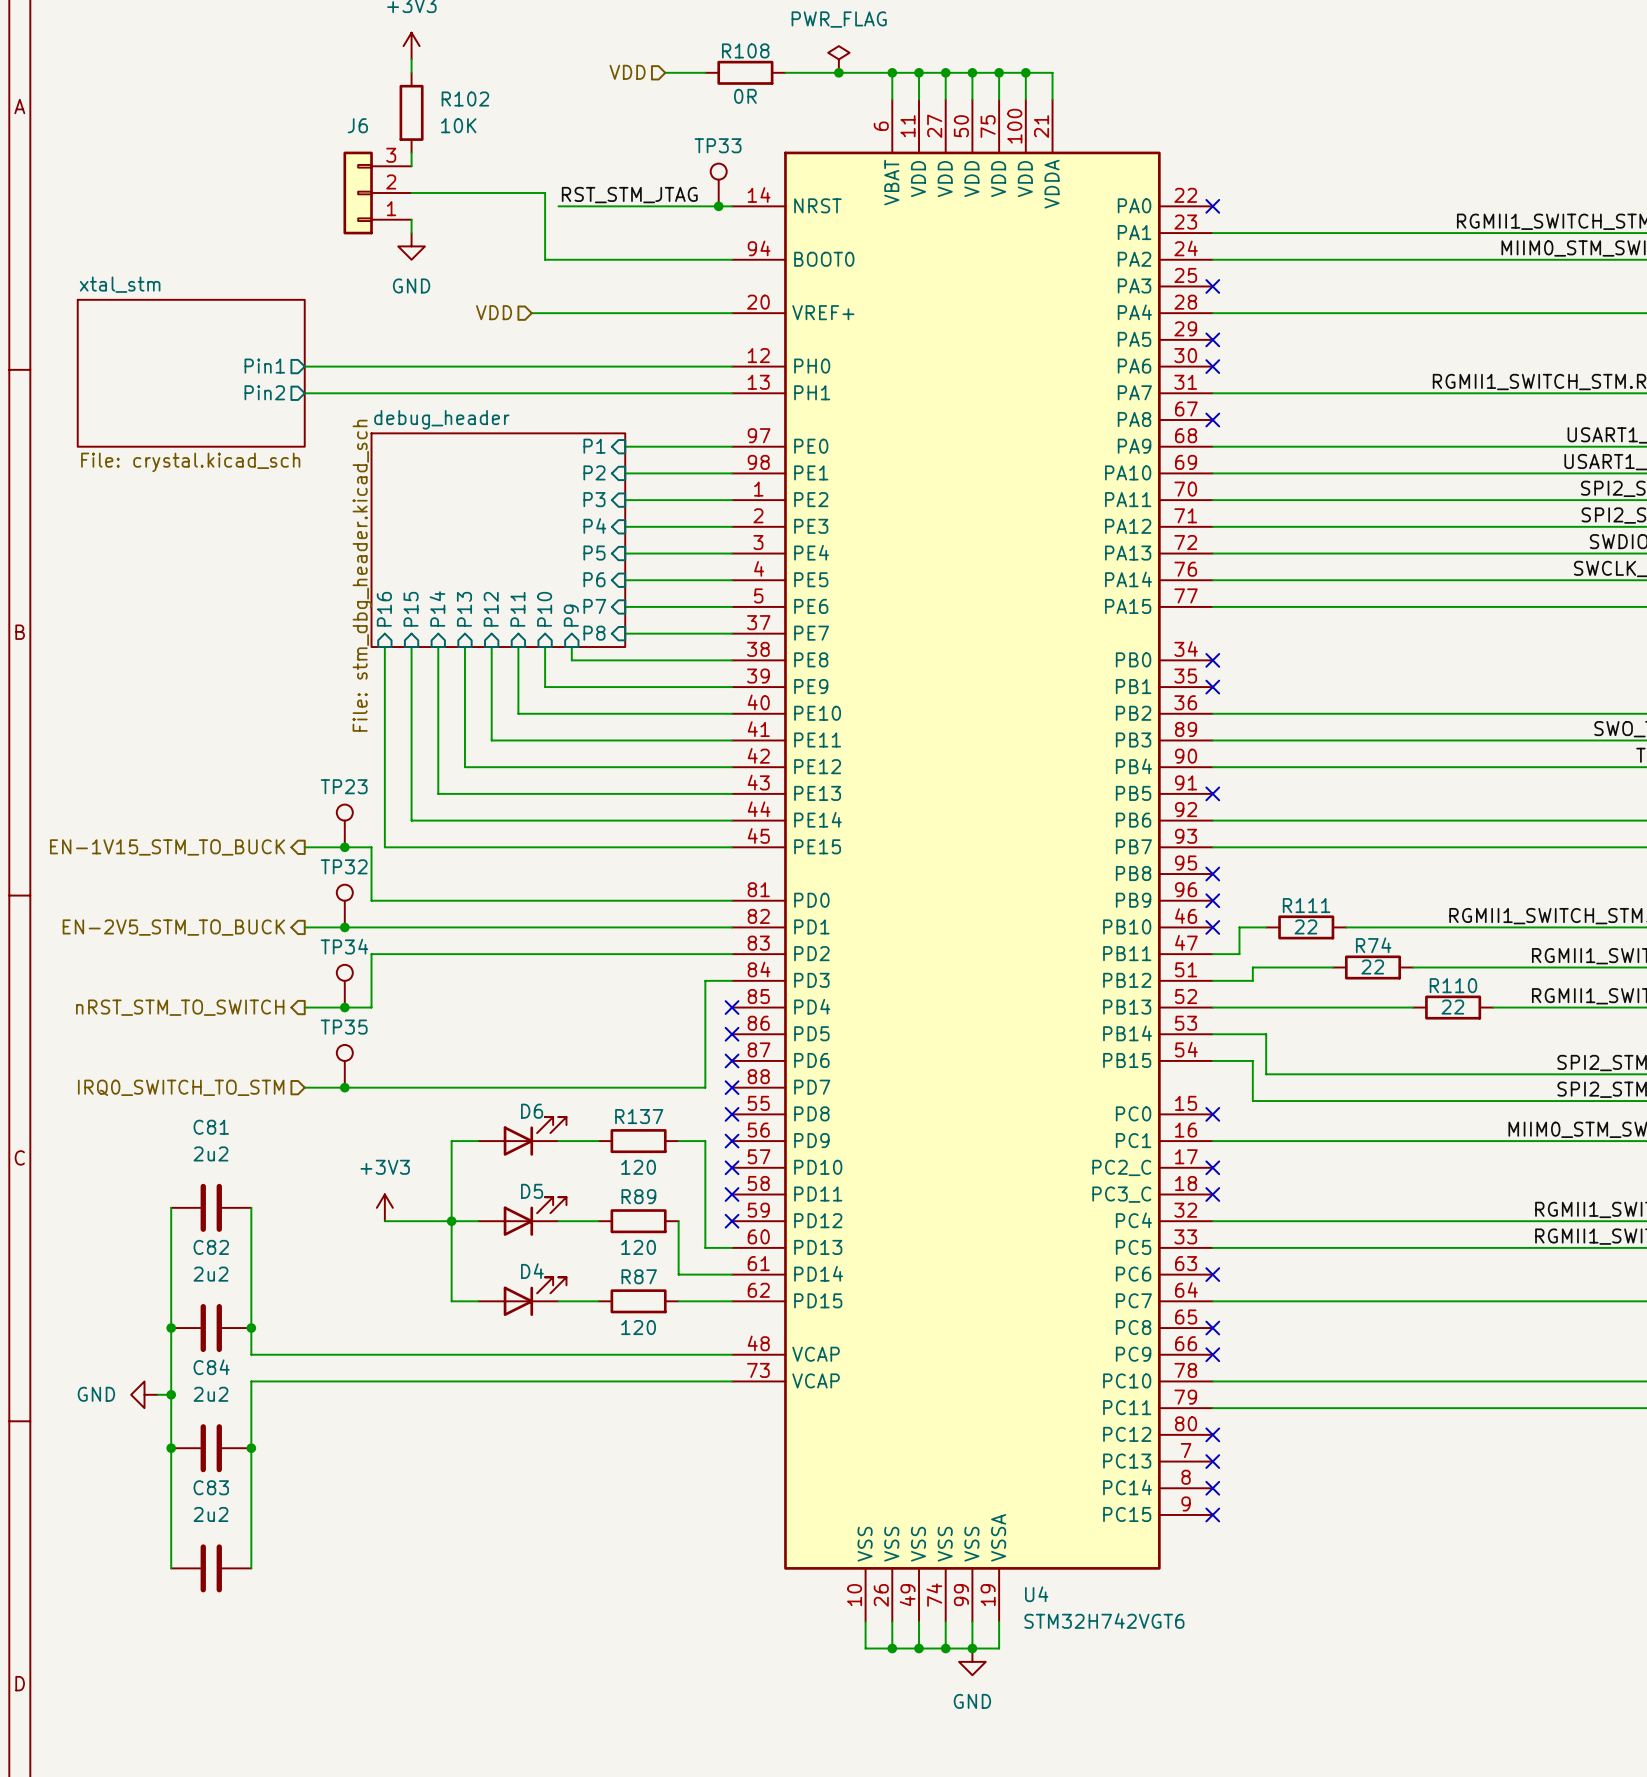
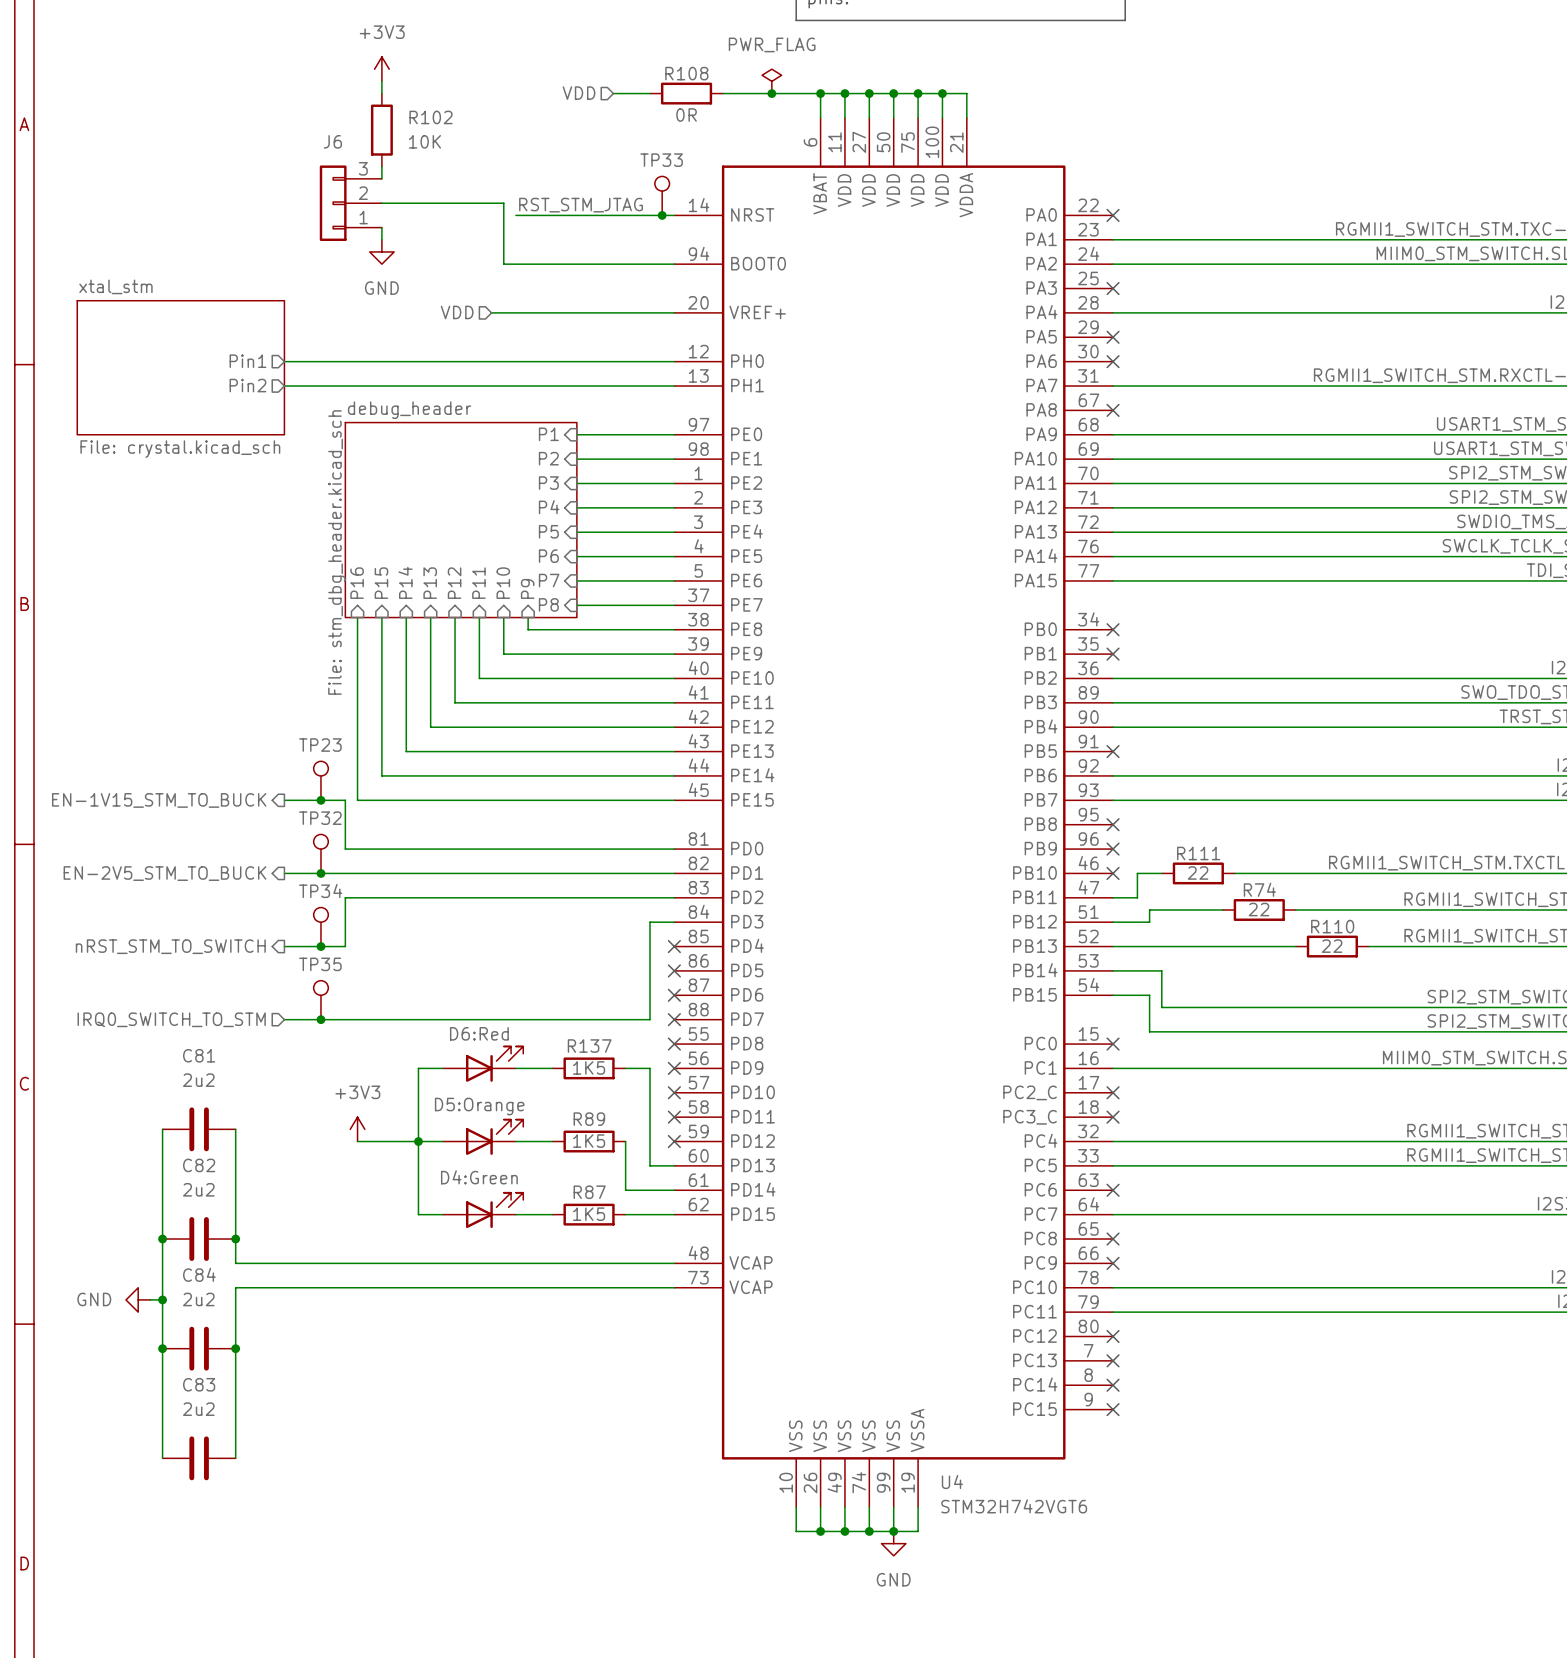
D6 text: none -> D6:Red (479, 1033)
D6 name: D6 (532, 1111) -> none
R137 value: 120 (638, 1167) -> 1K5 (589, 1067)
D5 text: none -> D5:Orange (479, 1106)
D5 name: D5 (532, 1191) -> none
R89 value: 120 (638, 1247) -> 1K5 (589, 1141)
D4 text: none -> D4:Green (479, 1177)
D4 name: D4 (532, 1271) -> none
R87 value: 120 (638, 1327) -> 1K5 (589, 1214)

